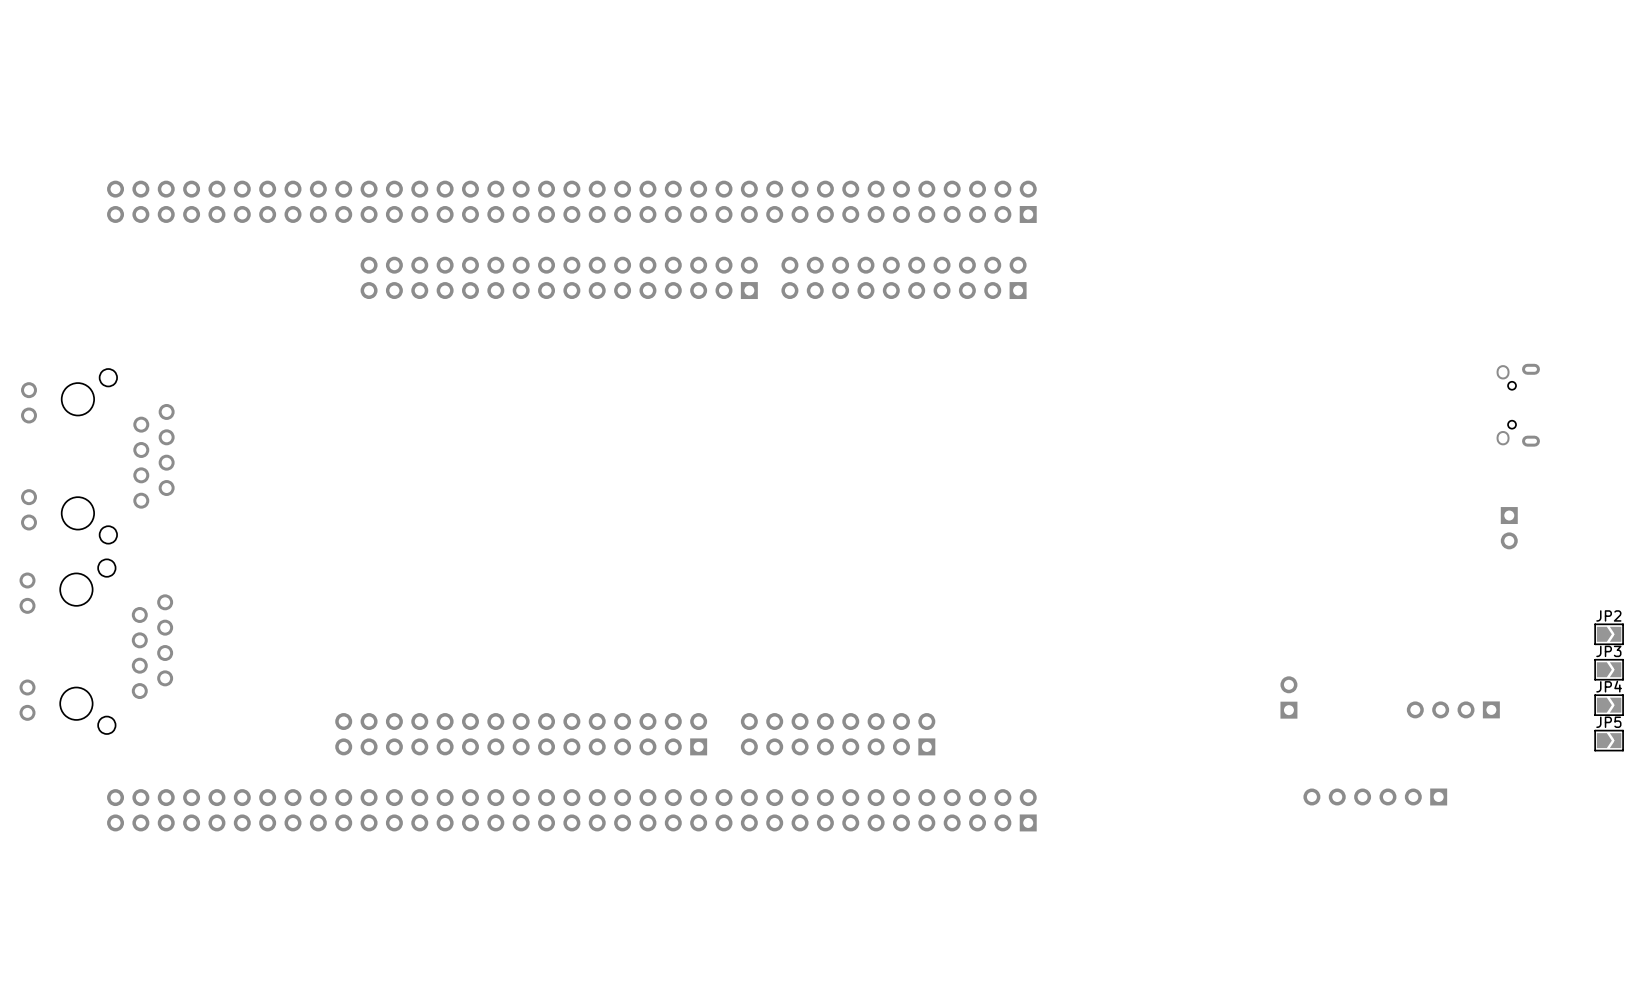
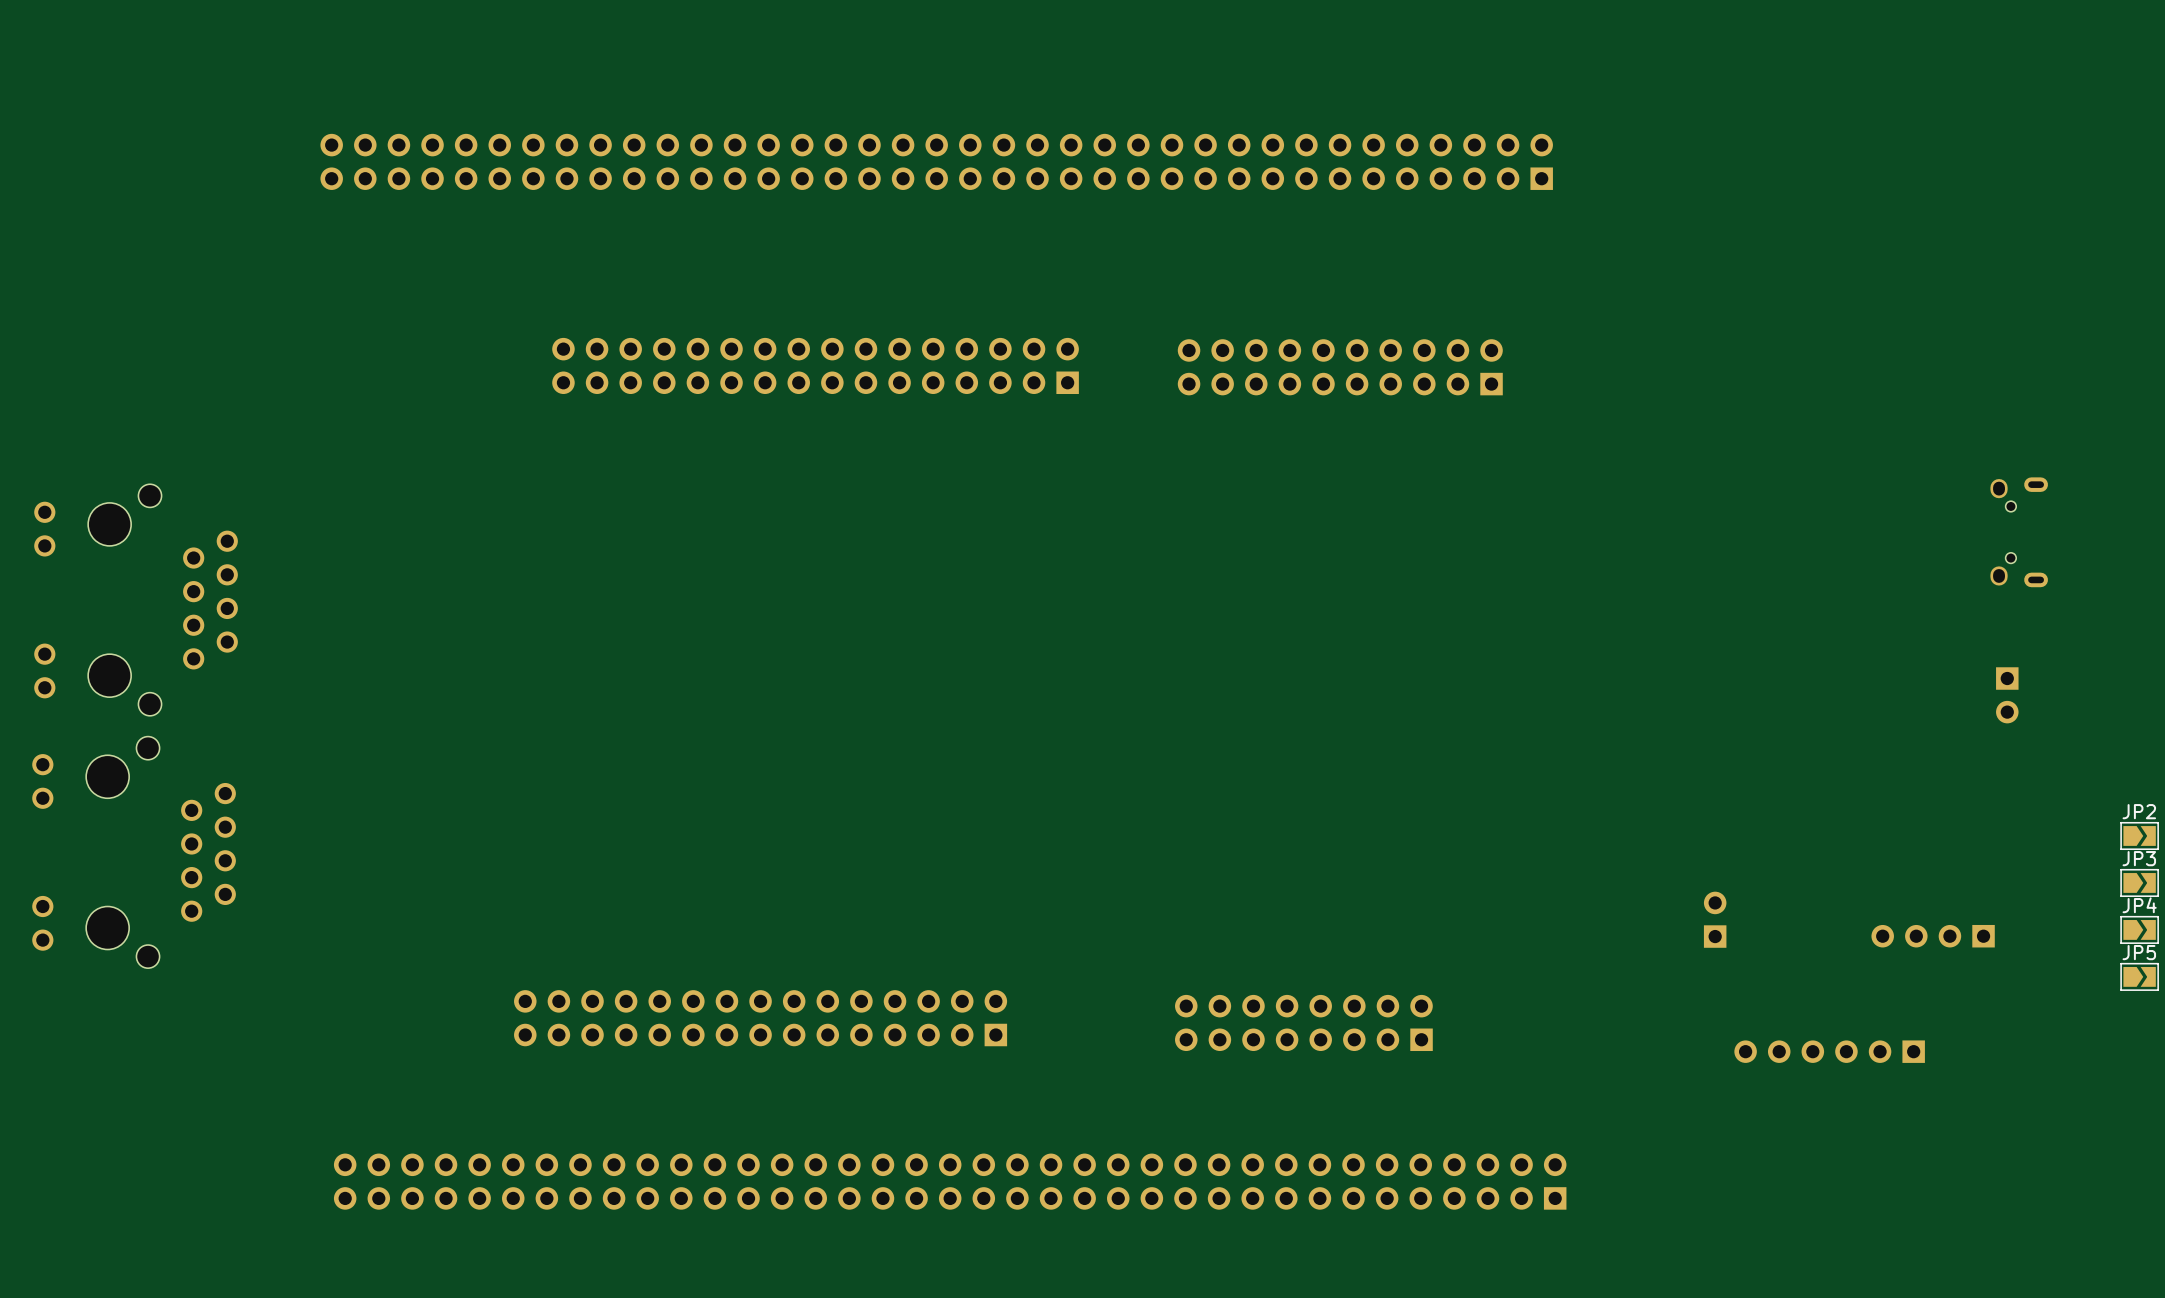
part position: (571, 201) -> (936, 161)
part position: (559, 277) -> (815, 365)
part position: (904, 277) -> (1340, 367)
part position: (521, 734) -> (760, 1018)
part position: (838, 734) -> (1303, 1022)
part position: (571, 810) -> (950, 1181)

